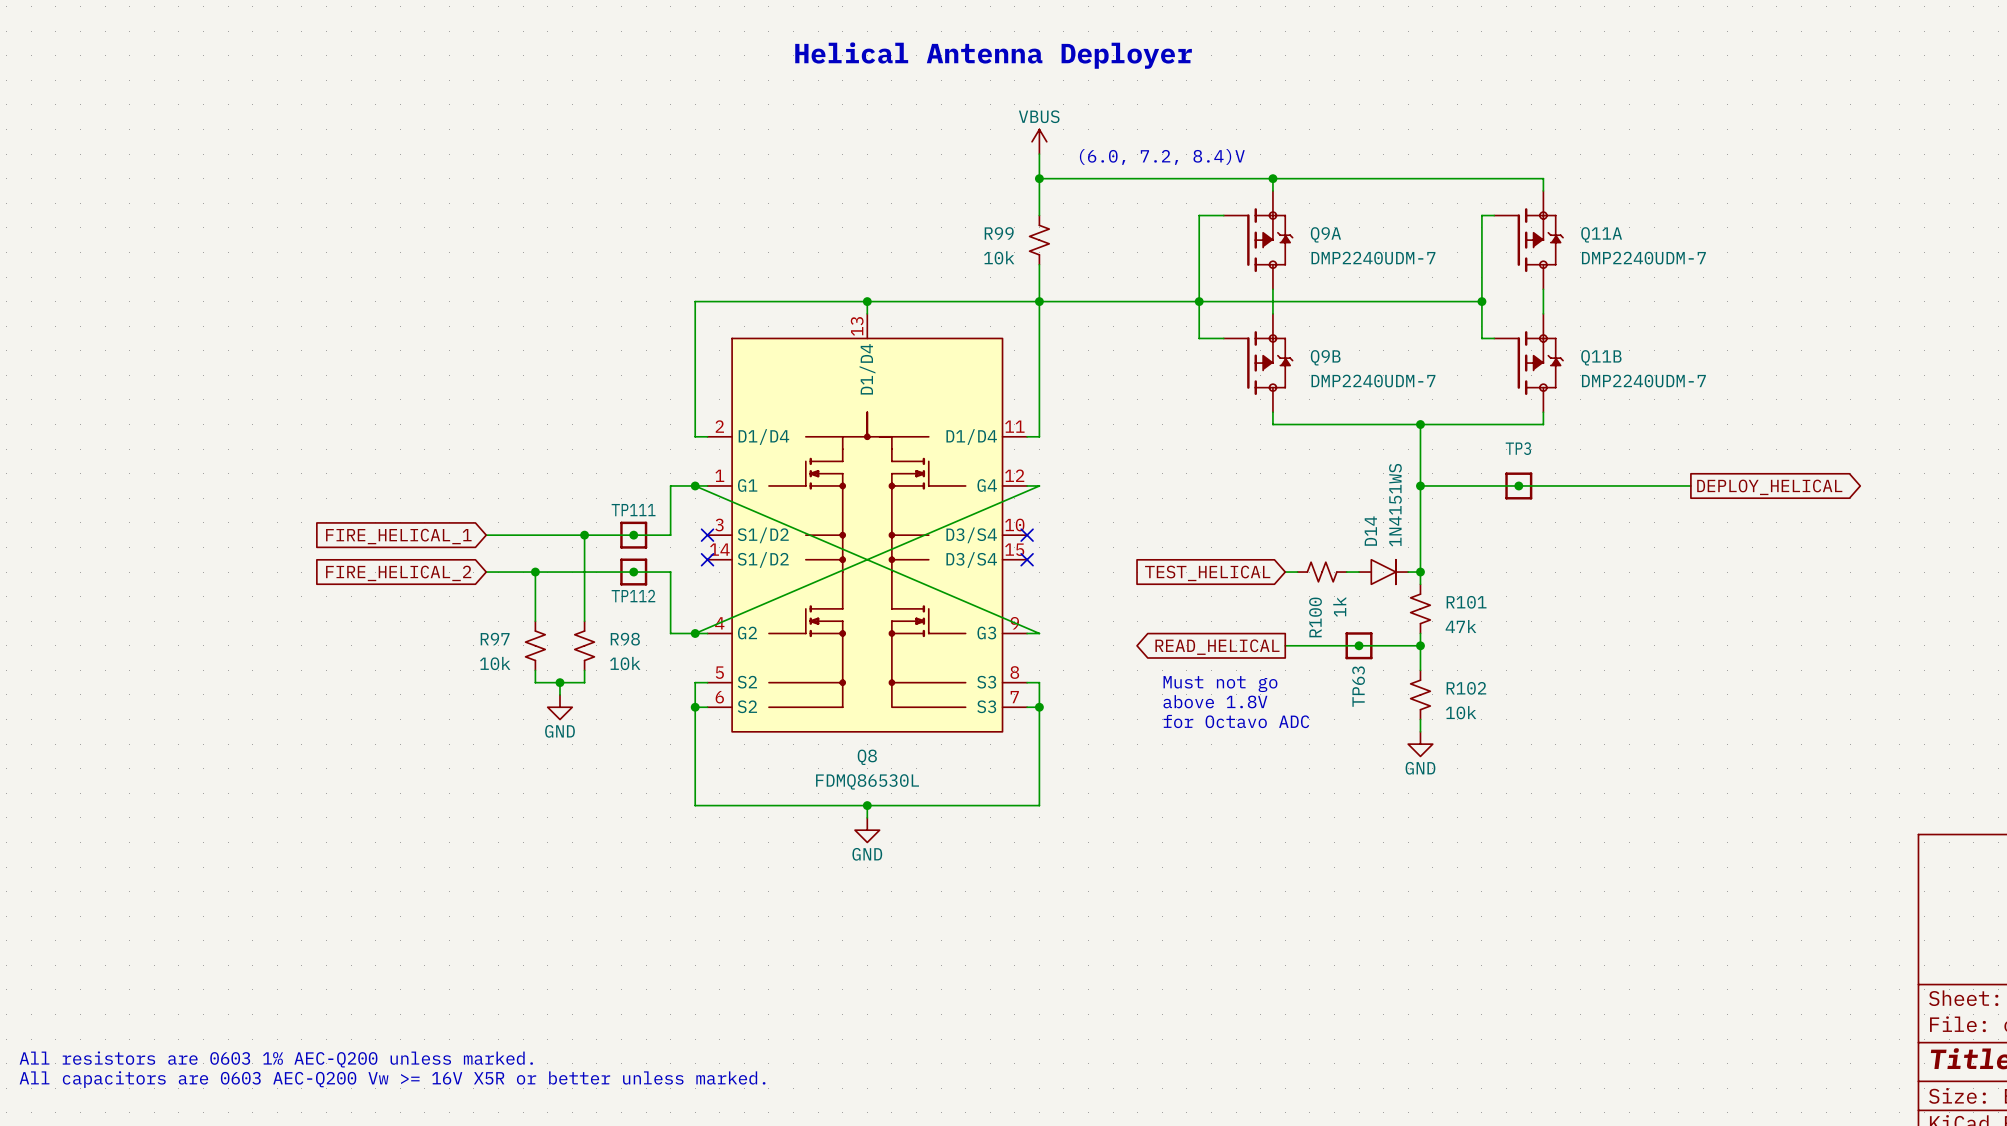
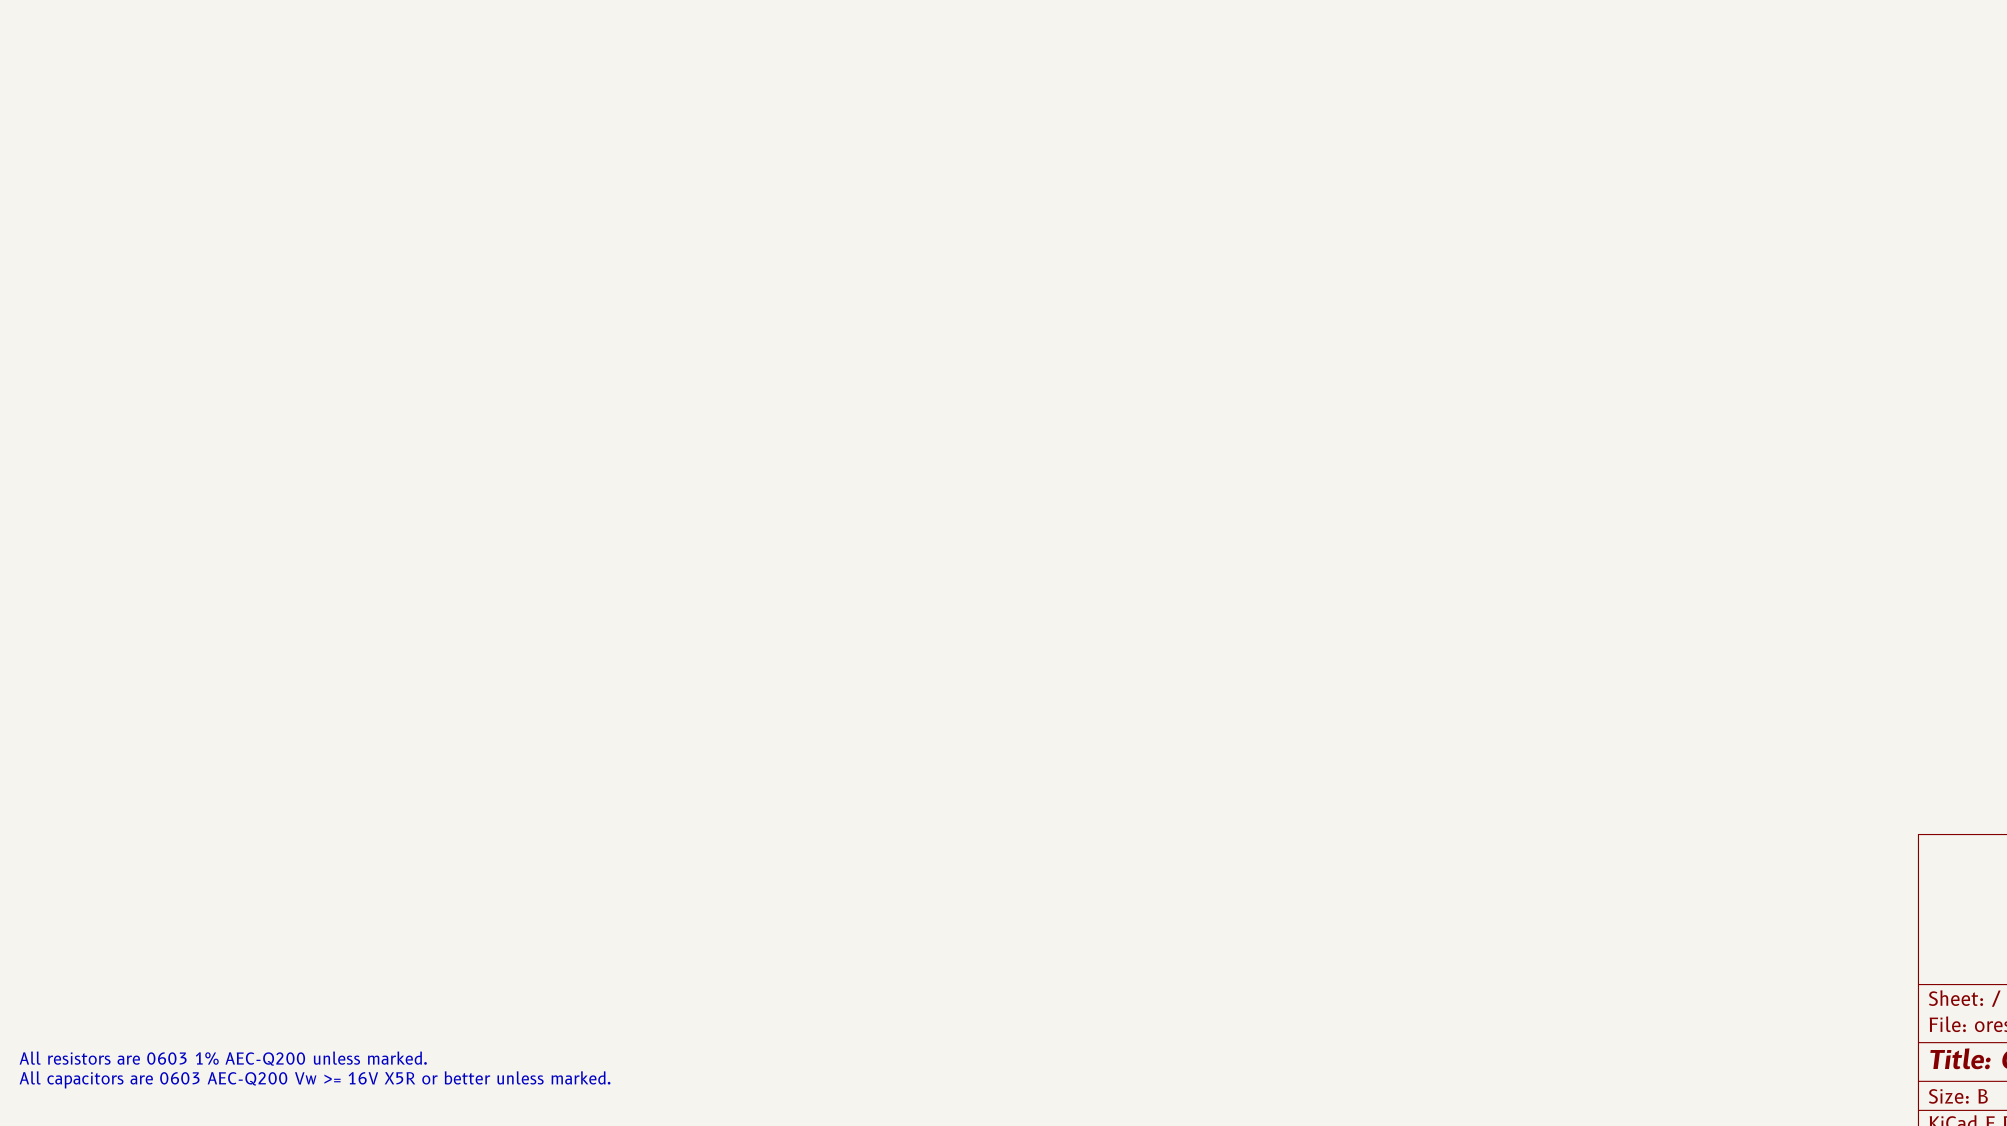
text: Helical Antenna Deployer (993, 55) -> none
power symbol: VBUS (1039, 141) -> none
wire: (1039, 154) (1039, 215) -> none
text: (6.0, 7.2, 8.4)V (1162, 156) -> none
wire: (1039, 178) (1543, 178) (1543, 190) -> none
junction: (1039, 178) -> none
wire: (1272, 178) (1272, 190) -> none
junction: (1272, 178) -> none
wire: (1223, 215) (1199, 215) (1199, 338) (1223, 338) -> none
wire: (1494, 215) (1481, 215) (1481, 338) (1494, 338) -> none
R99: 10k (1039, 240) -> none
Q9A: DMP2240UDM-7 (1258, 240) -> none
Q11A: DMP2240UDM-7 (1529, 240) -> none
wire: (1039, 264) (1039, 436) (1027, 436) -> none
wire: (1272, 289) (1272, 313) -> none
wire: (1543, 289) (1543, 313) -> none
wire: (867, 301) (867, 313) -> none
junction: (867, 301) -> none
junction: (1039, 301) -> none
junction: (1199, 301) -> none
wire: (1481, 301) (695, 301) (695, 436) (707, 436) -> none
junction: (1481, 301) -> none
Q9B: DMP2240UDM-7 (1258, 363) -> none
Q11B: DMP2240UDM-7 (1529, 363) -> none
wire: (1272, 412) (1272, 424) (1543, 424) (1543, 412) -> none
wire: (1420, 424) (1420, 584) -> none
junction: (1420, 424) -> none
wire: (695, 485) (1039, 633) (1027, 633) -> none
junction: (695, 485) -> none
wire: (707, 485) (670, 485) (670, 535) (486, 535) -> none
wire: (1027, 485) (1039, 485) (695, 633) -> none
wire: (1420, 485) (1690, 485) -> none
junction: (1420, 485) -> none
junction: (1518, 485) -> none
TP3: (1518, 485) -> none
global label: DEPLOY_HELICAL (1769, 487) -> none
Q8: FDMQ86530L (867, 522) -> none
wire: (584, 535) (584, 621) -> none
junction: (584, 535) -> none
junction: (633, 535) -> none
TP111: (633, 535) -> none
no-connect mark: (707, 535) -> none
no-connect mark: (1027, 535) -> none
global label: FIRE_HELICAL_1 (398, 536) -> none
no-connect mark: (707, 559) -> none
no-connect mark: (1027, 559) -> none
wire: (486, 572) (670, 572) (670, 633) (707, 633) -> none
wire: (535, 572) (535, 621) -> none
junction: (535, 572) -> none
junction: (633, 572) -> none
TP112: (633, 572) -> none
wire: (1285, 572) (1297, 572) -> none
R100: 1k (1322, 572) -> none
wire: (1346, 572) (1359, 572) -> none
D14: 1N4151WS (1383, 572) -> none
wire: (1408, 572) (1420, 572) -> none
junction: (1420, 572) -> none
global label: FIRE_HELICAL_2 (398, 573) -> none
global label: TEST_HELICAL (1207, 573) -> none
R101: 47k (1420, 608) -> none
junction: (695, 633) -> none
wire: (1420, 633) (1420, 670) -> none
R97: 10k (535, 645) -> none
R98: 10k (584, 645) -> none
wire: (1285, 645) (1420, 645) -> none
junction: (1359, 645) -> none
TP63: (1359, 645) -> none
junction: (1420, 645) -> none
global label: READ_HELICAL (1217, 647) -> none
wire: (535, 670) (535, 682) (584, 682) (584, 670) -> none
wire: (559, 682) (559, 694) -> none
junction: (559, 682) -> none
wire: (707, 682) (695, 682) (695, 805) (1039, 805) (1039, 682) (1027, 682) -> none
text: Must not go (1220, 684) -> none
R102: 10k (1420, 694) -> none
text: above 1.8V (1215, 701) -> none
power symbol: GND (559, 707) -> none
wire: (695, 707) (707, 707) -> none
junction: (695, 707) -> none
wire: (1027, 707) (1039, 707) -> none
junction: (1039, 707) -> none
wire: (1420, 719) (1420, 731) -> none
text: for Octavo ADC (1236, 721) -> none
power symbol: GND (1420, 744) -> none
wire: (867, 805) (867, 817) -> none
junction: (867, 805) -> none
power symbol: GND (867, 830) -> none

